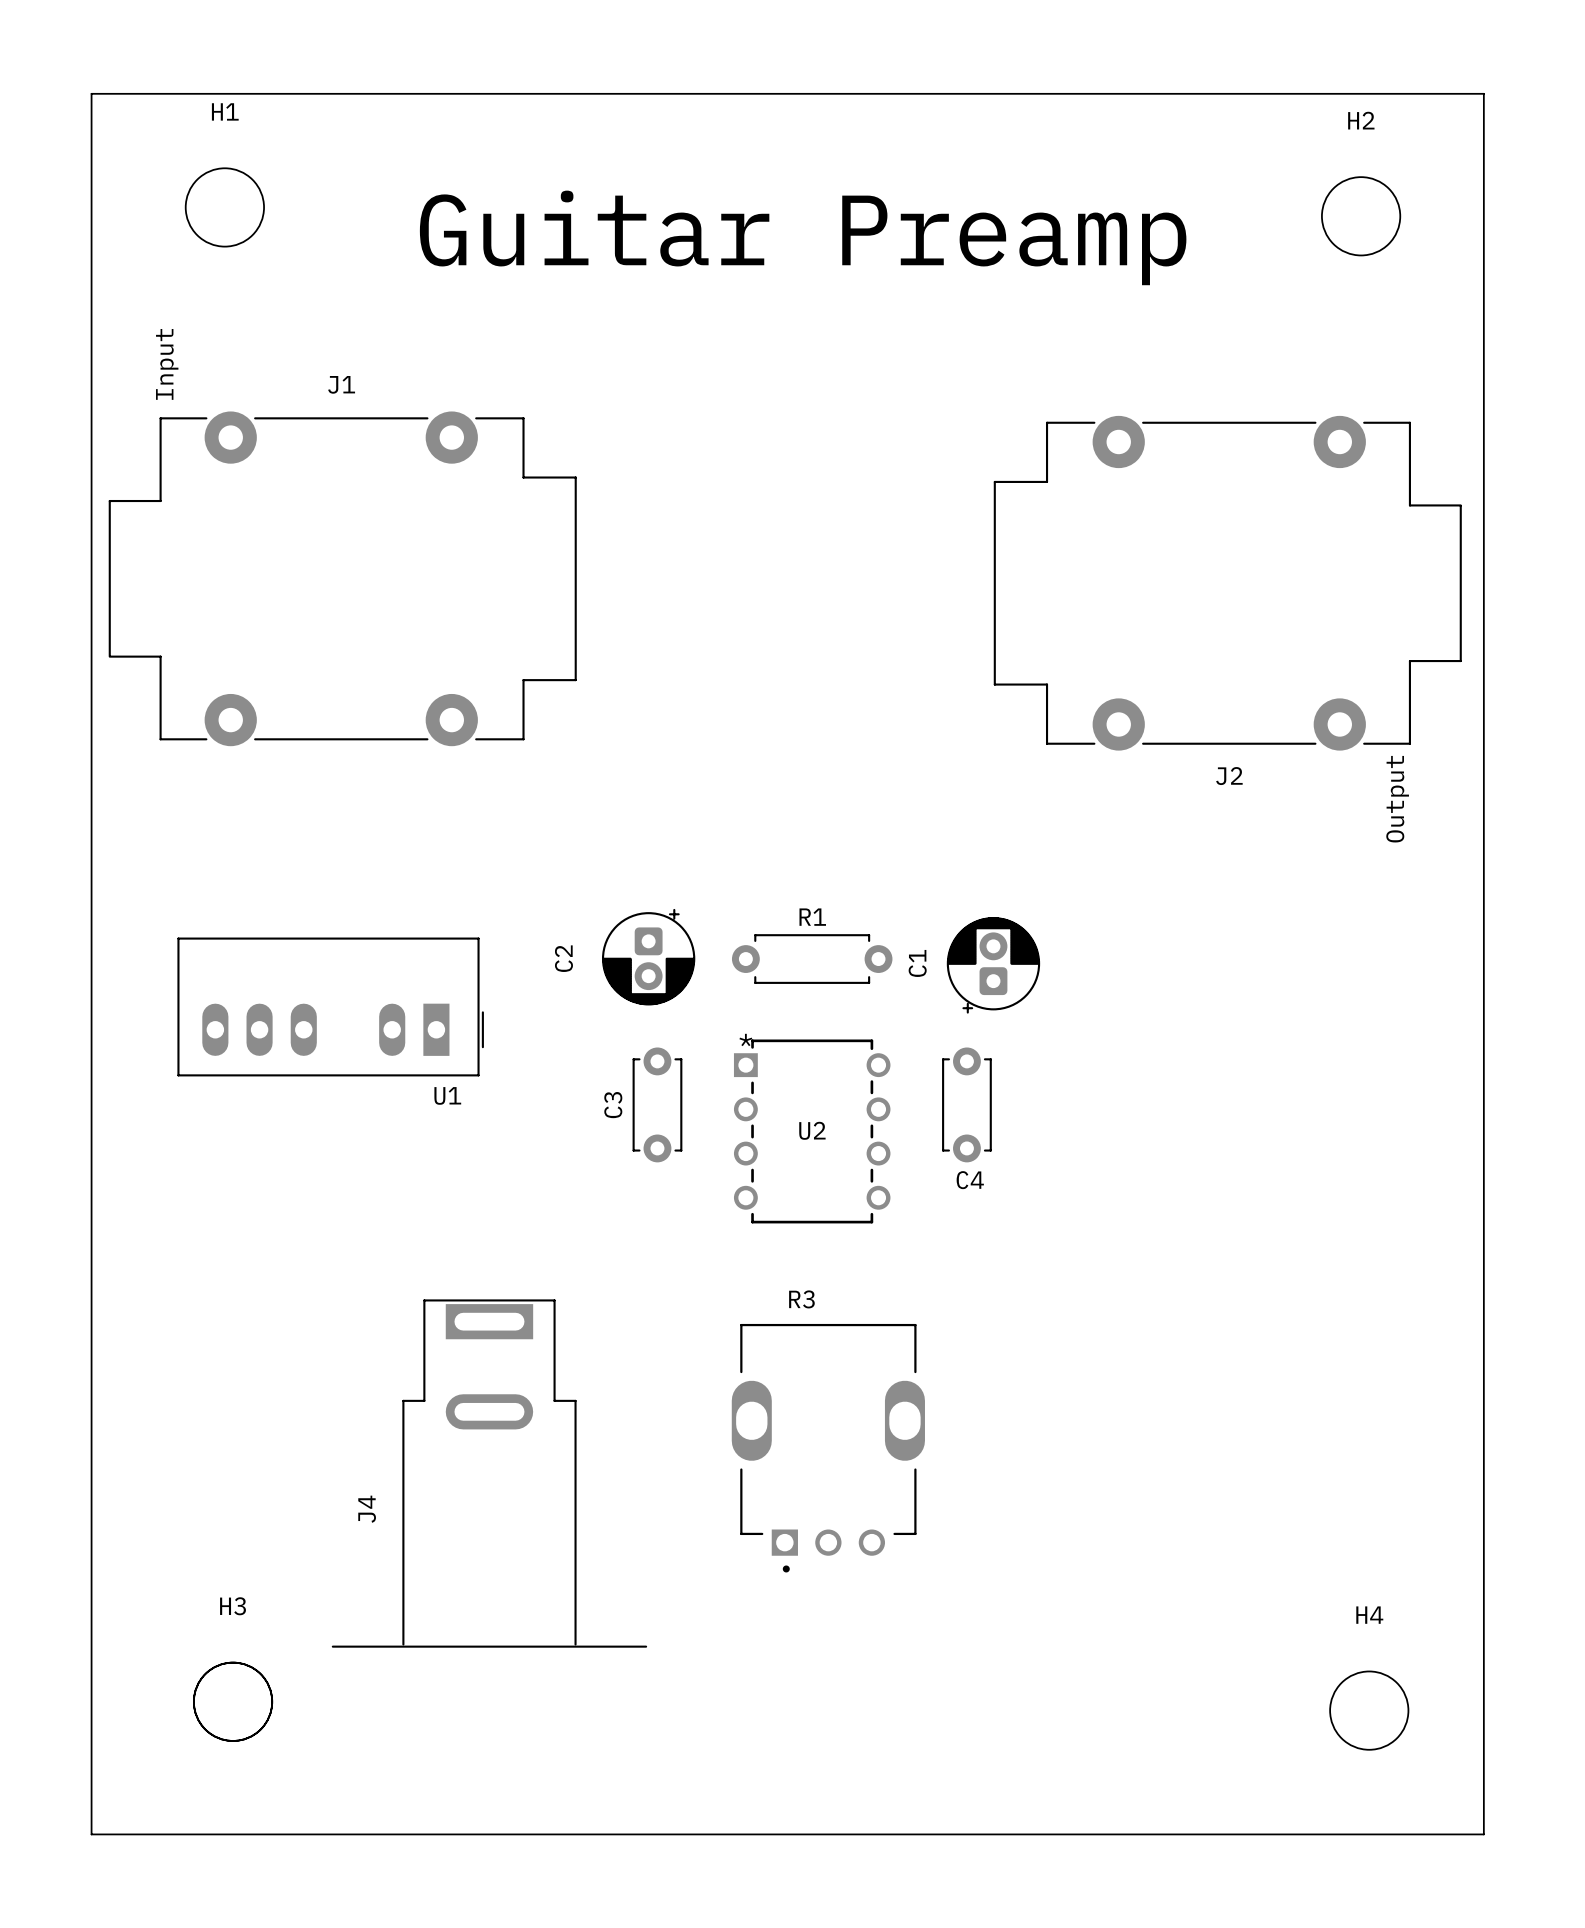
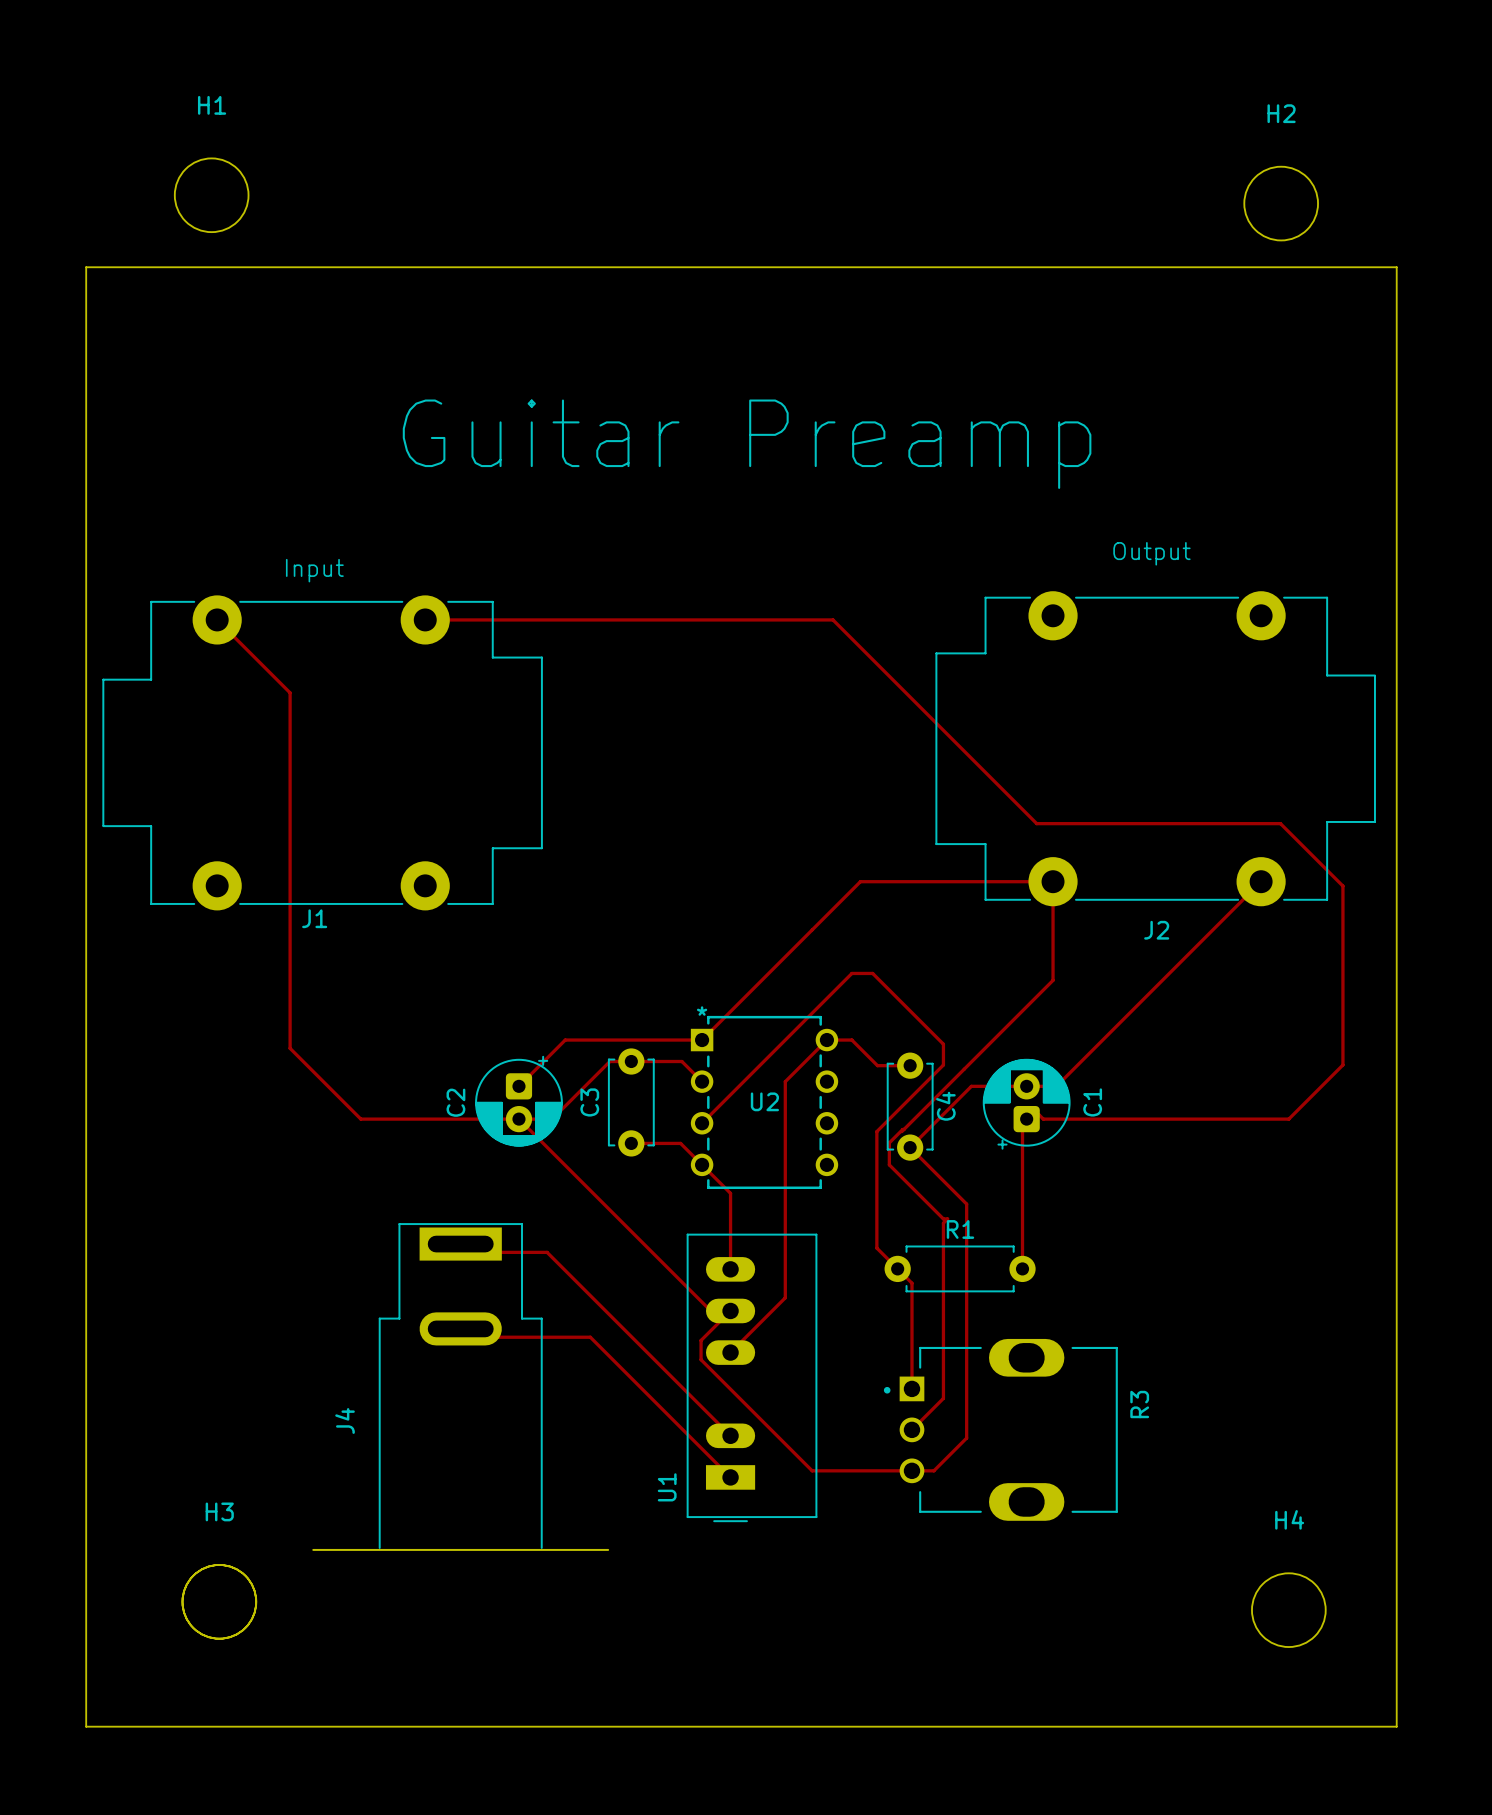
text position: Guitar Preamp (803, 237) -> Guitar Preamp (747, 444)
board edge: (91, 283) (91, 93) (1483, 93) (1483, 283) -> (86, 267) (1396, 267)
text rotation: 0° (167, 364) -> 90° clockwise (314, 570)
text position: Input (167, 364) -> Input (314, 570)
J1 name position: J1 (341, 384) -> J1 (314, 918)
J1 position: (342, 578) -> (322, 752)
J2 position: (1227, 583) -> (1155, 748)
track: none -> (217, 619) (290, 692) (290, 1048) (360, 1119) (552, 1119) (609, 1061) (681, 1061) (702, 1081)
track: none -> (425, 619) (833, 619) (1036, 823) (1280, 823) (1342, 886) (1342, 1065) (1288, 1119) (1043, 1119) (1039, 1114) (1026, 1114) (1026, 1119) (1022, 1123) (1022, 1268)
text rotation: 0° (1397, 799) -> 90° clockwise (1151, 553)
text position: Output (1397, 799) -> Output (1151, 553)
track: none -> (1261, 881) (1056, 1086) (971, 1086) (910, 1147) (966, 1204) (966, 1438) (933, 1470) (812, 1470) (701, 1359) (701, 1340) (730, 1310) (710, 1310) (518, 1119)
C2 position: (648, 957) -> (518, 1101)
C2 name position: C2 (563, 958) -> C2 (455, 1102)
R1 position: (812, 959) -> (960, 1268)
C1: (993, 965) -> none
U1 rotation: 0° (330, 1006) -> 90° clockwise (752, 1377)
U1 position: (330, 1006) -> (752, 1377)
C3 position: (657, 1104) -> (631, 1102)
C4: (966, 1104) -> none
U2 position: (812, 1131) -> (764, 1102)
track: none -> (910, 1065) (877, 1065) (851, 1040) (826, 1040) (785, 1081) (785, 1297) (730, 1352)
track: none -> (518, 1086) (565, 1040) (702, 1040) (860, 881) (1053, 881) (1053, 980) (901, 1131)
text: none -> C1 (1092, 1102)
part: none -> (1026, 1104)
part: none -> (910, 1106)
text: none -> C4 (945, 1106)
track: none -> (702, 1123) (851, 973) (872, 973) (943, 1044) (943, 1065) (876, 1131) (876, 1248) (911, 1283) (911, 1388)
track: none -> (903, 1129) (889, 1142) (889, 1164) (943, 1218) (947, 1218) (943, 1223) (943, 1398) (911, 1429)
track: none -> (631, 1143) (680, 1143) (730, 1193) (730, 1269)
track: none -> (460, 1252) (547, 1252) (730, 1435)
track: none -> (460, 1337) (590, 1337) (730, 1477)
R3 rotation: 0° (828, 1448) -> 90° clockwise (1000, 1429)
R3 position: (828, 1448) -> (1000, 1429)

